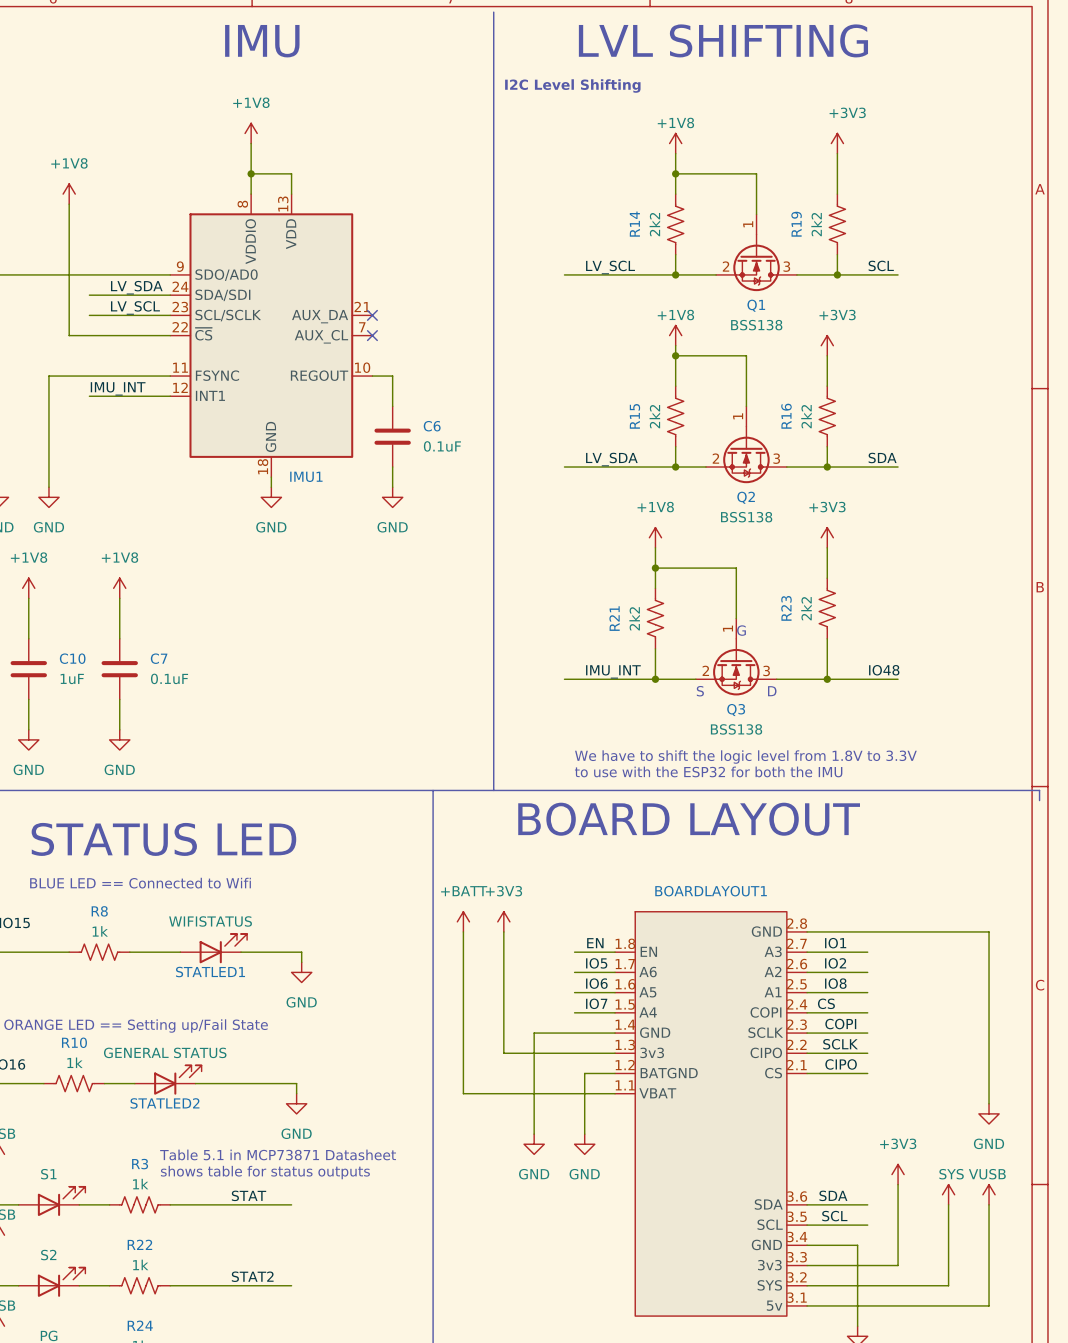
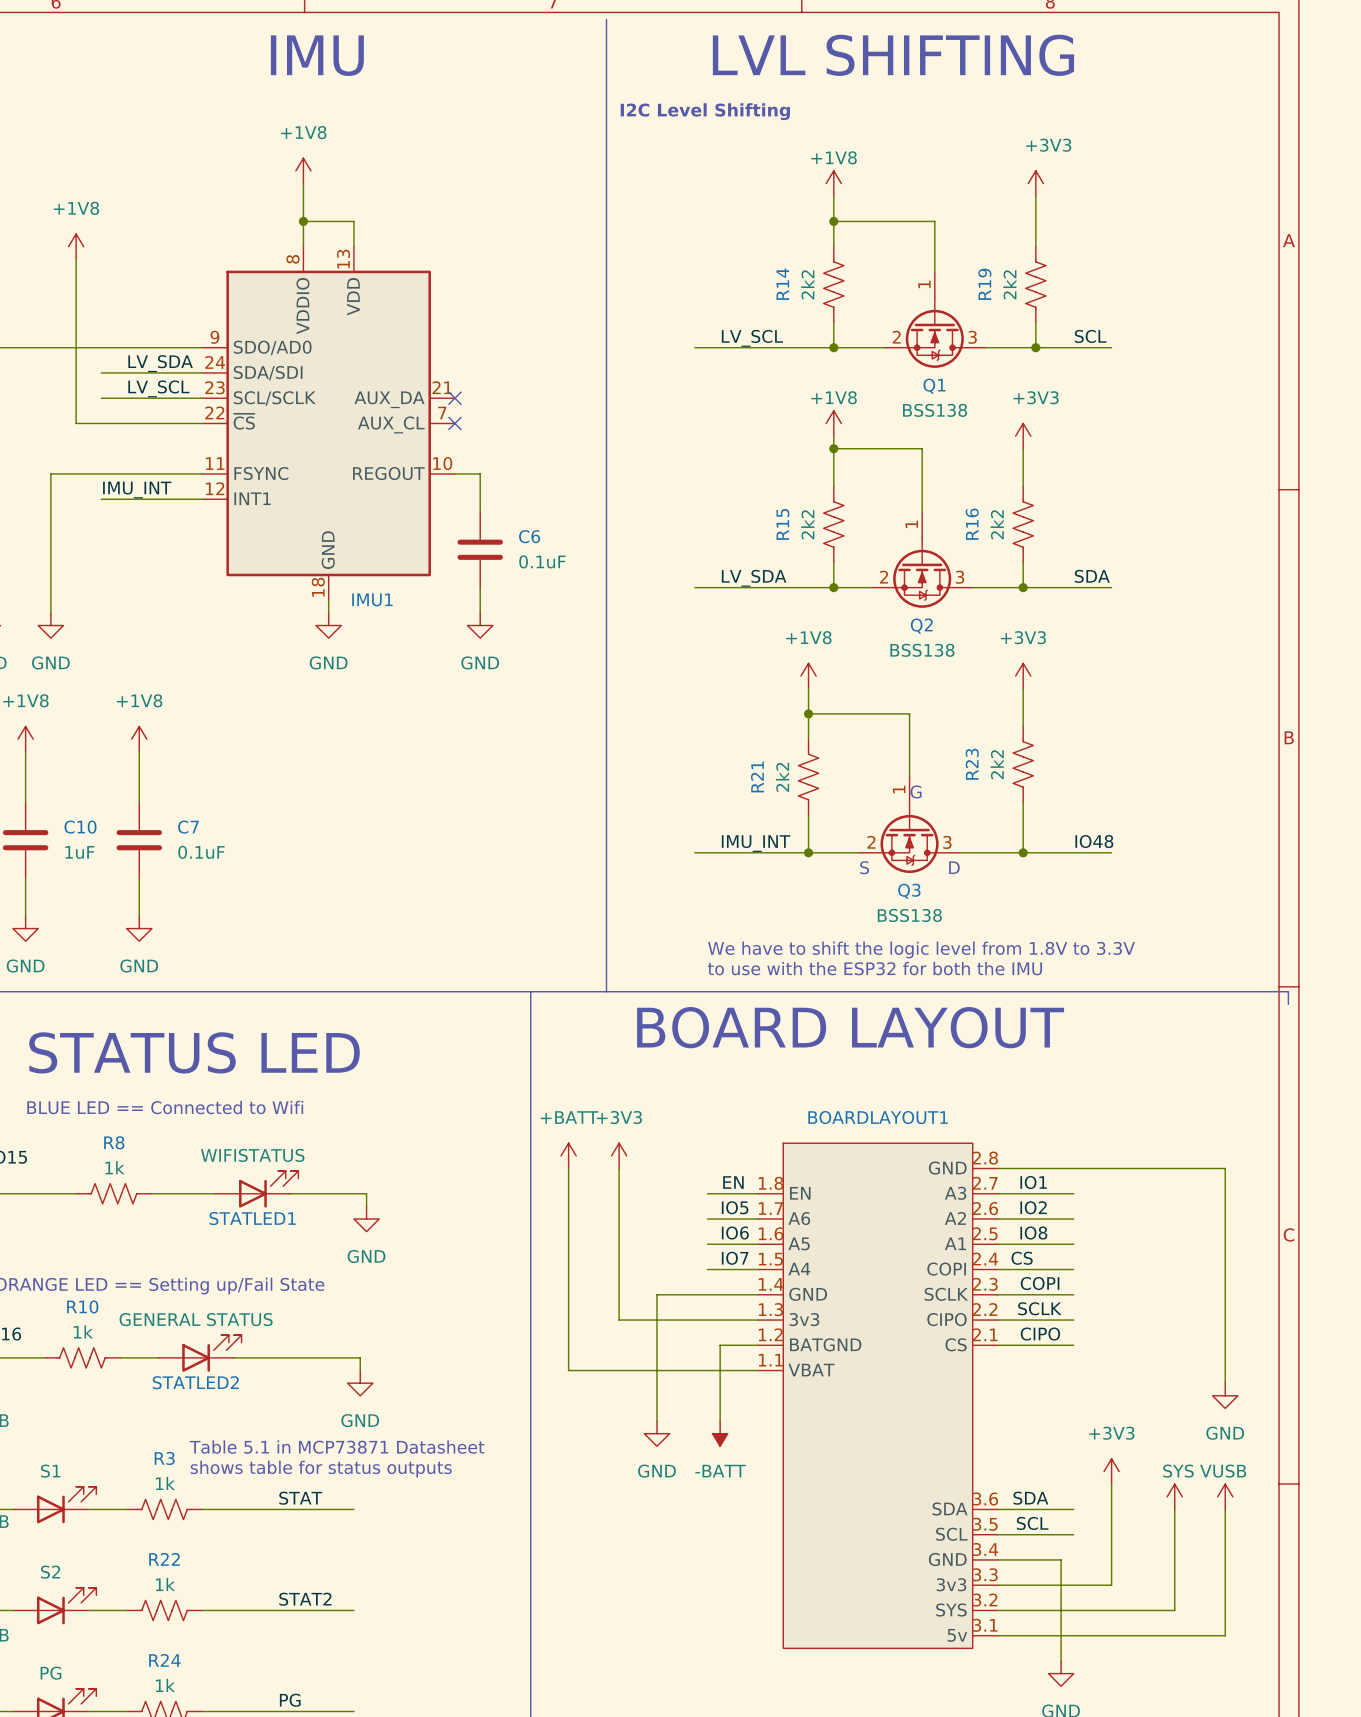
power symbol: GND (584, 1144) -> -BATT (720, 1433)

